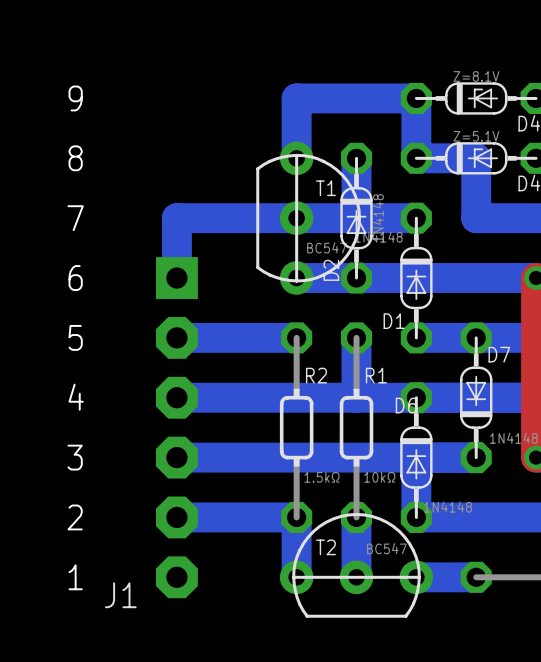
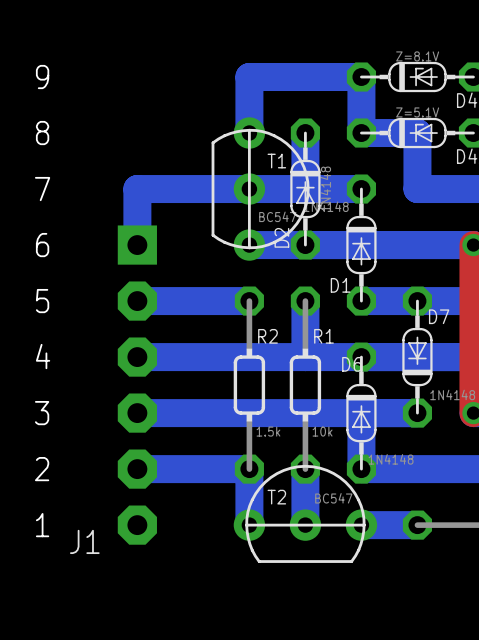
R2 value: 1.5kΩ (321, 477) -> 1.5k (268, 431)
R1 value: 10kΩ (379, 477) -> 10k (322, 431)

